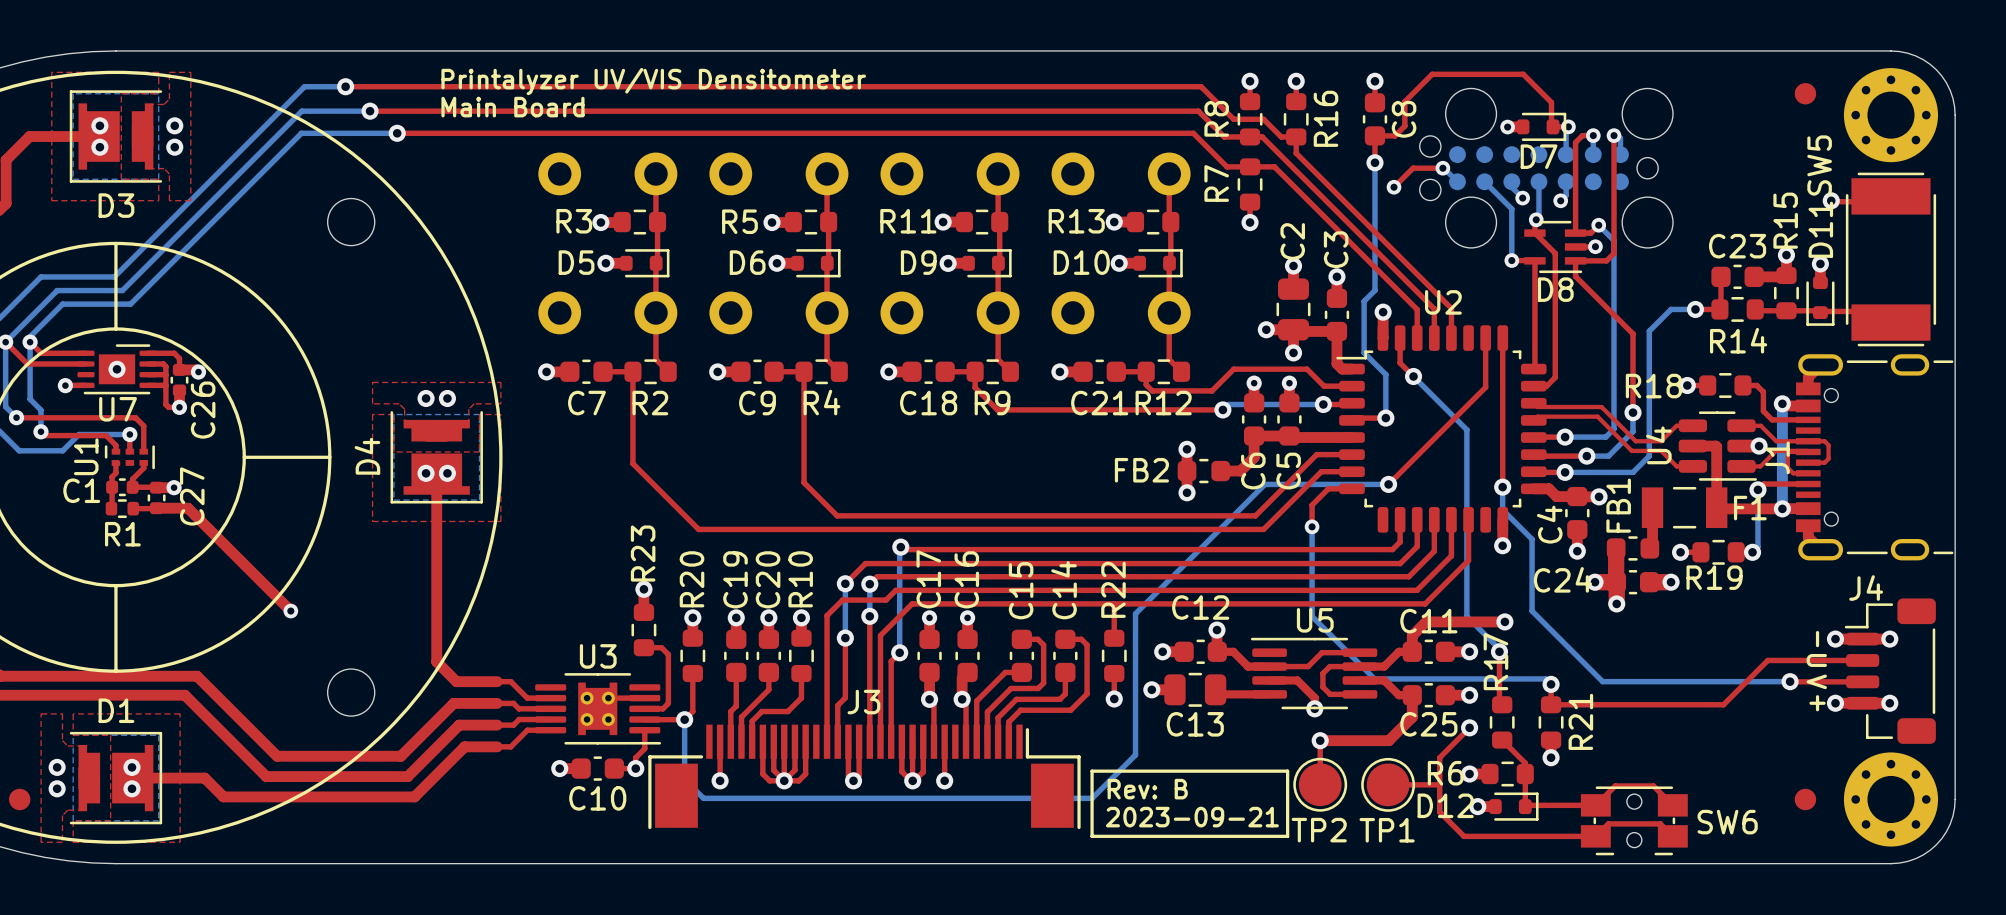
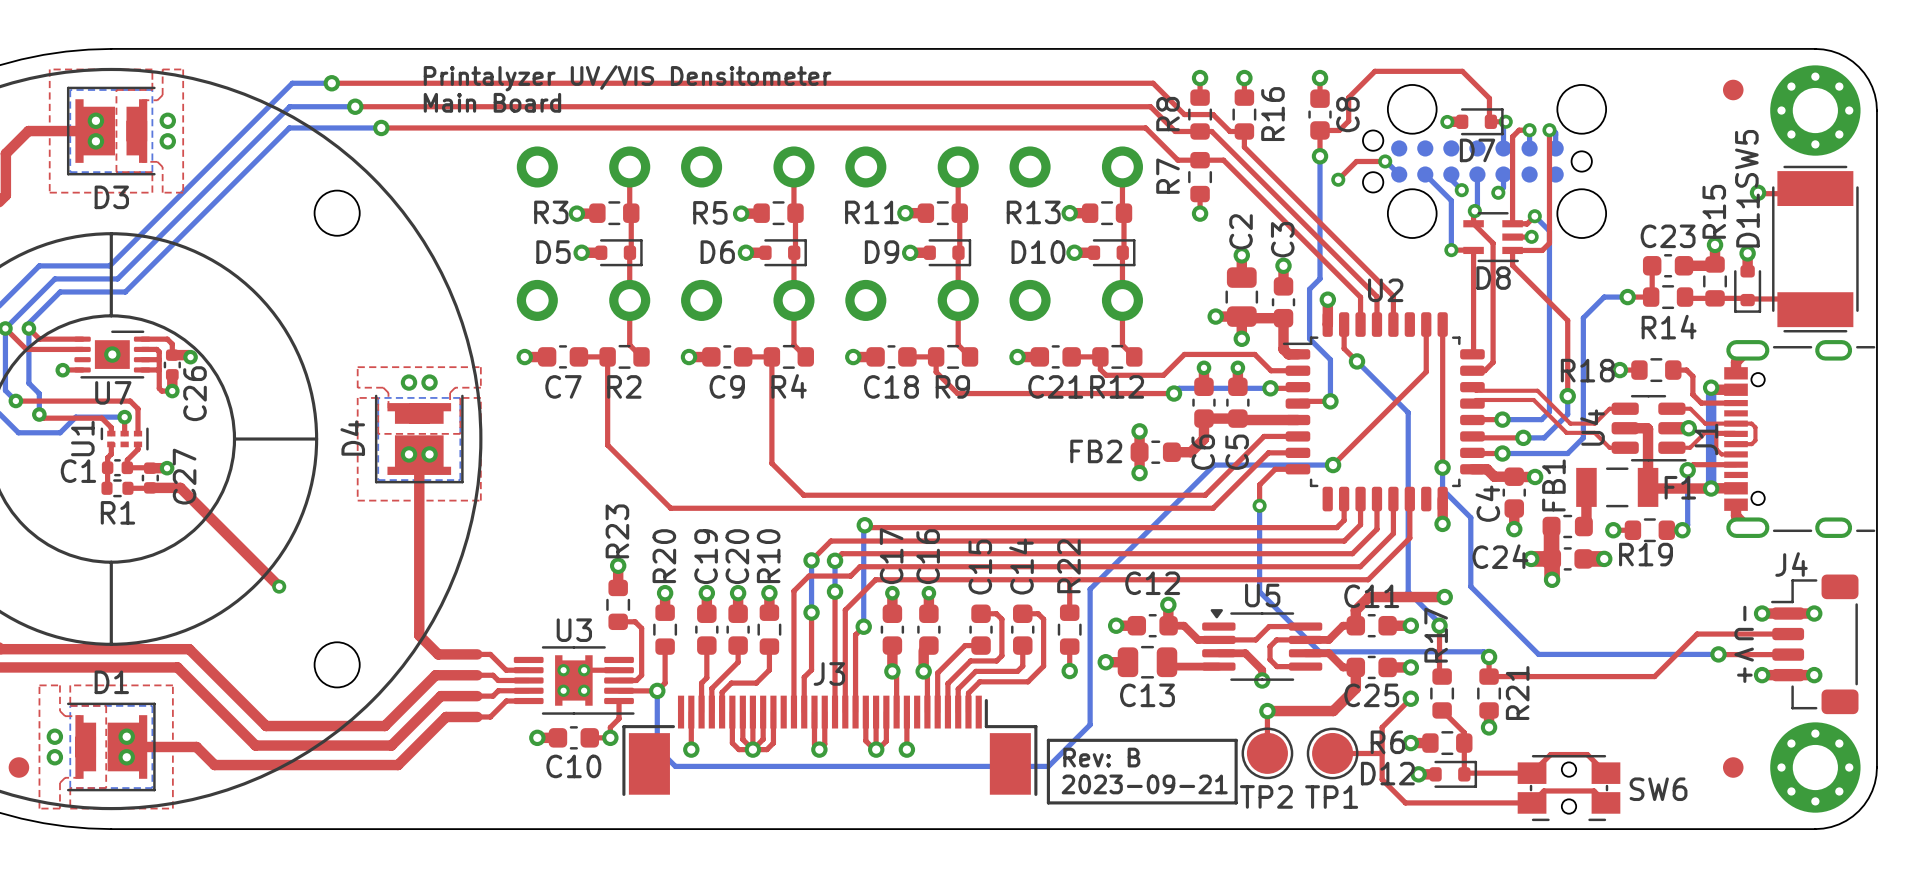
U5 footprint: [1250, 637, 1378, 710] -> [1202, 609, 1323, 681]

